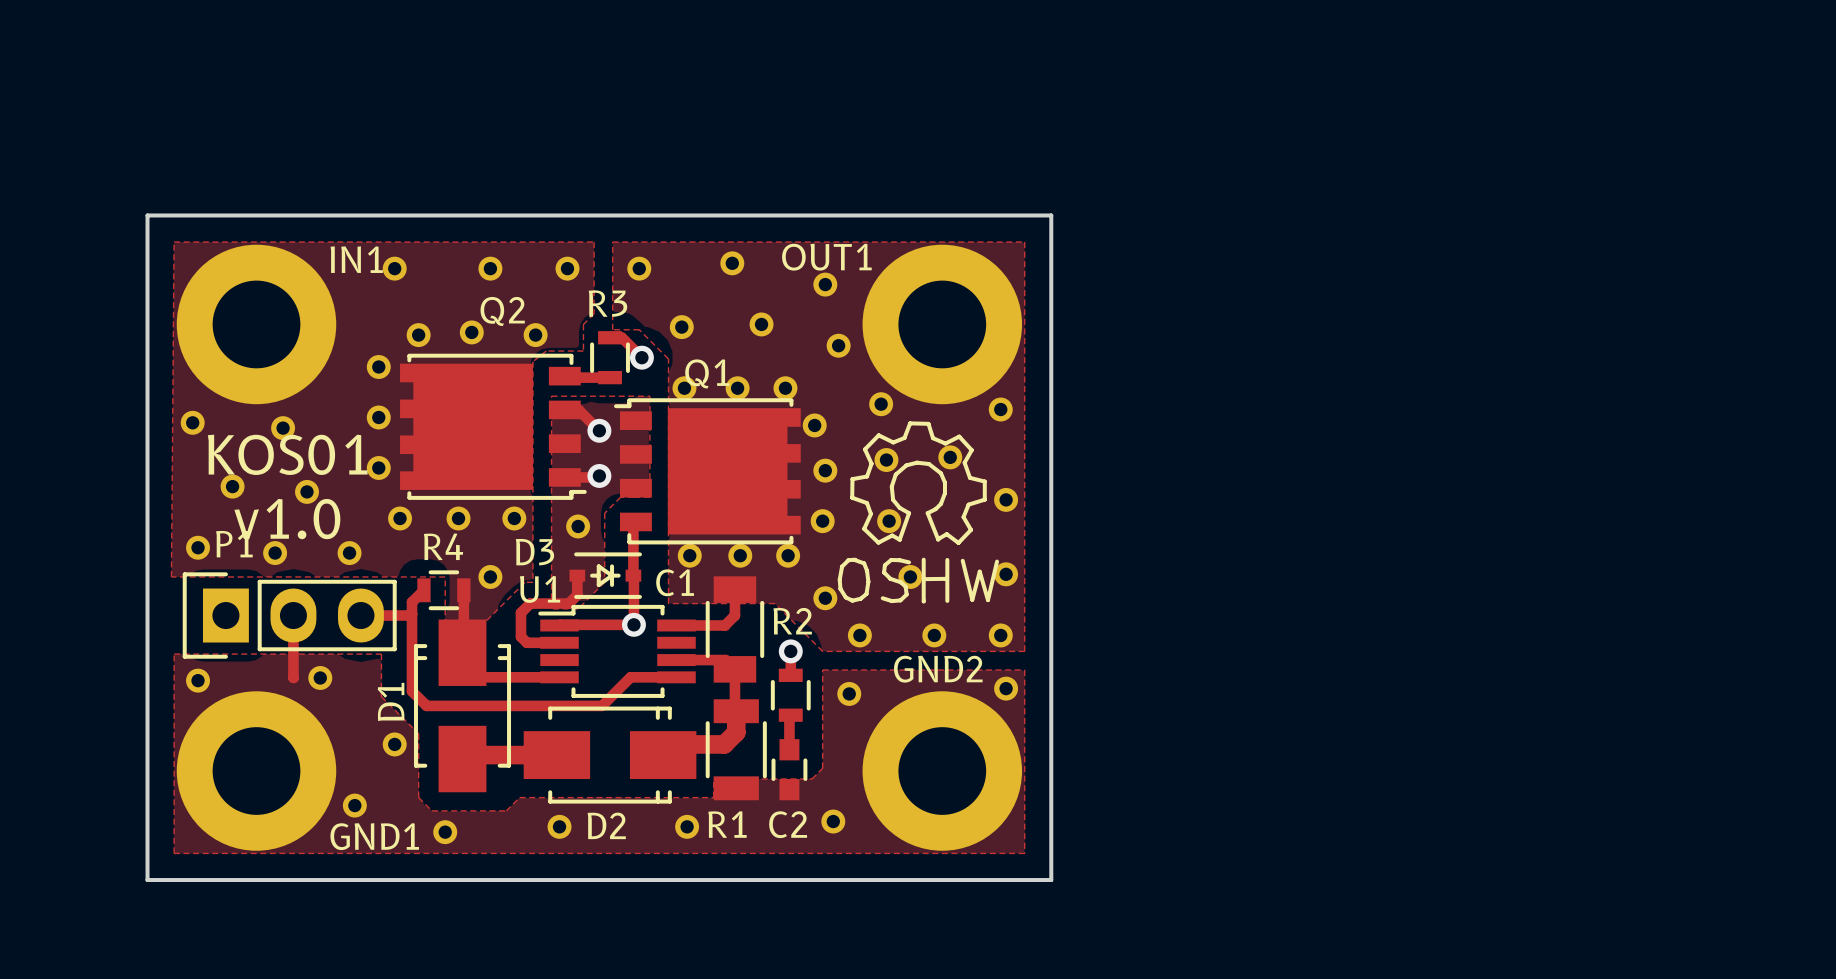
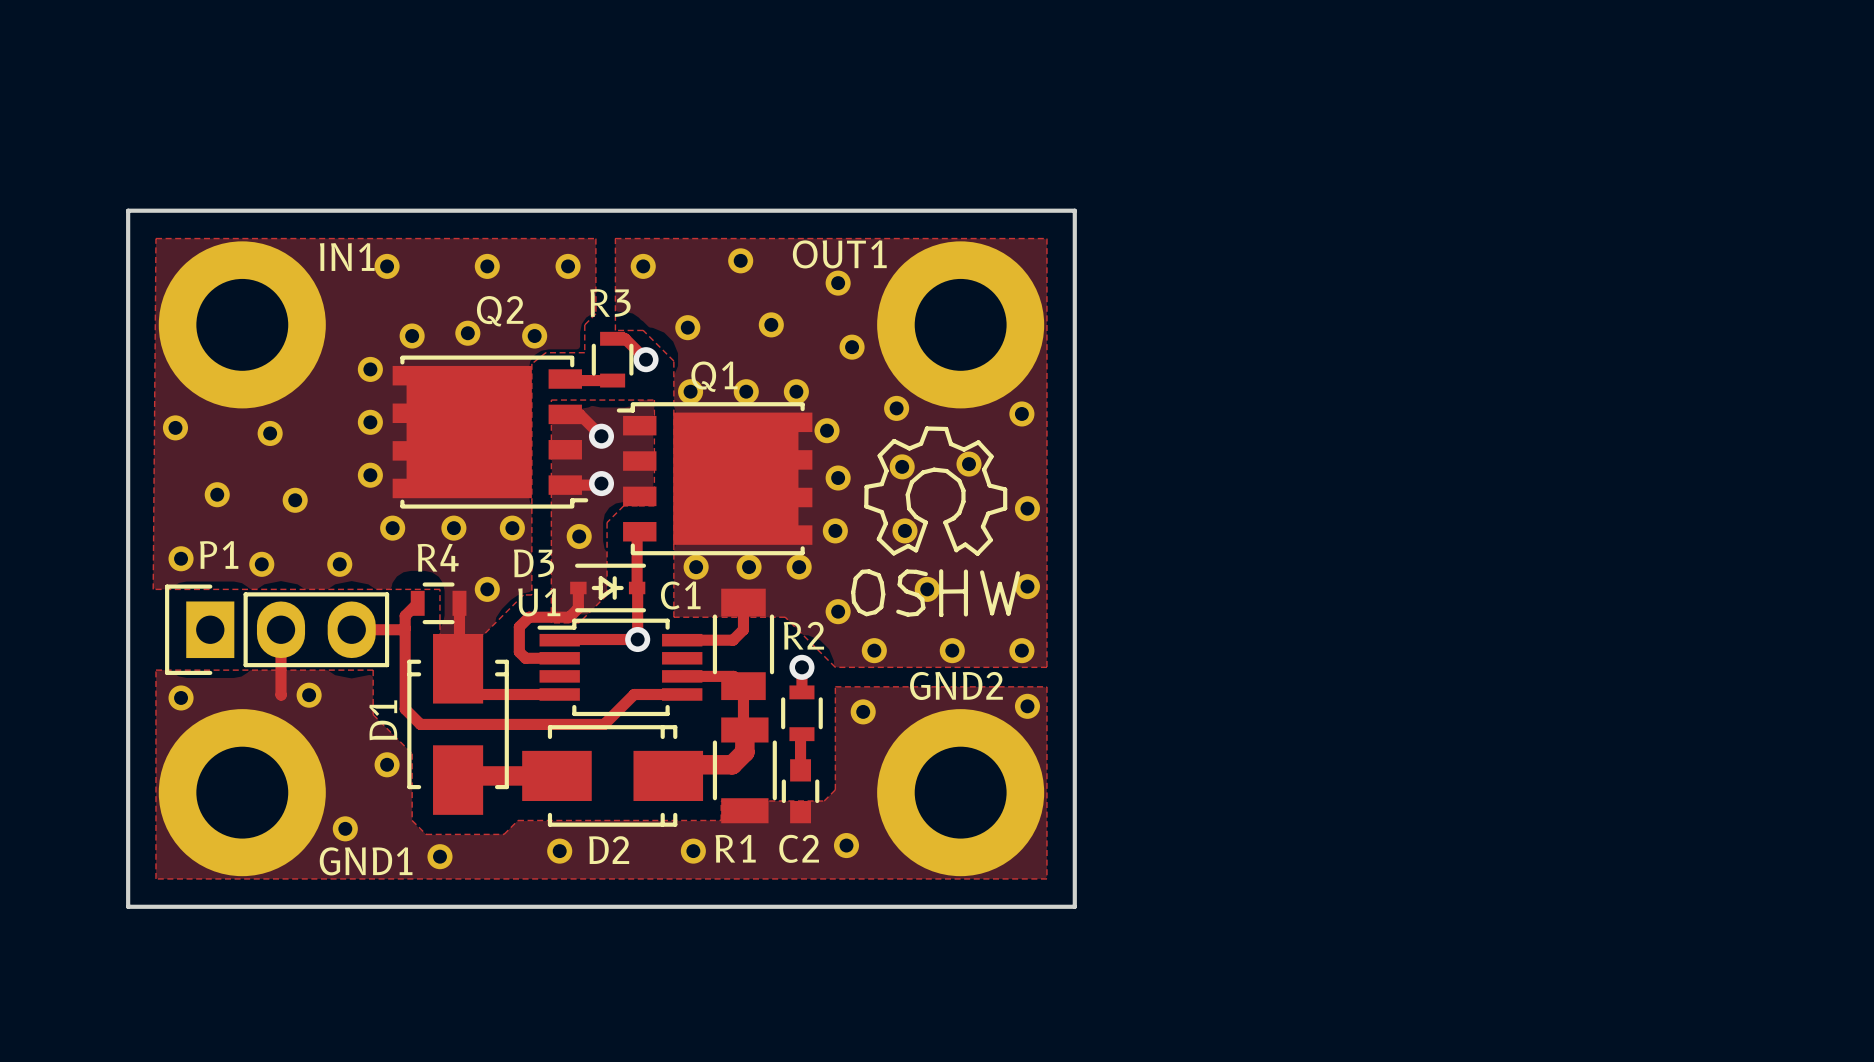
text: KOS01 (287, 454) -> none
text: v1.0 (287, 519) -> none

